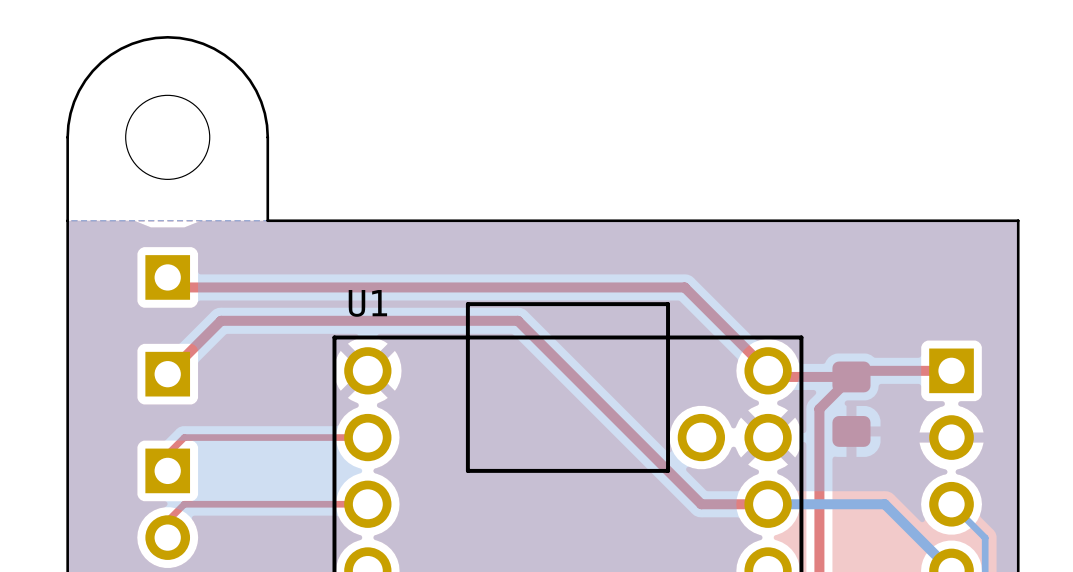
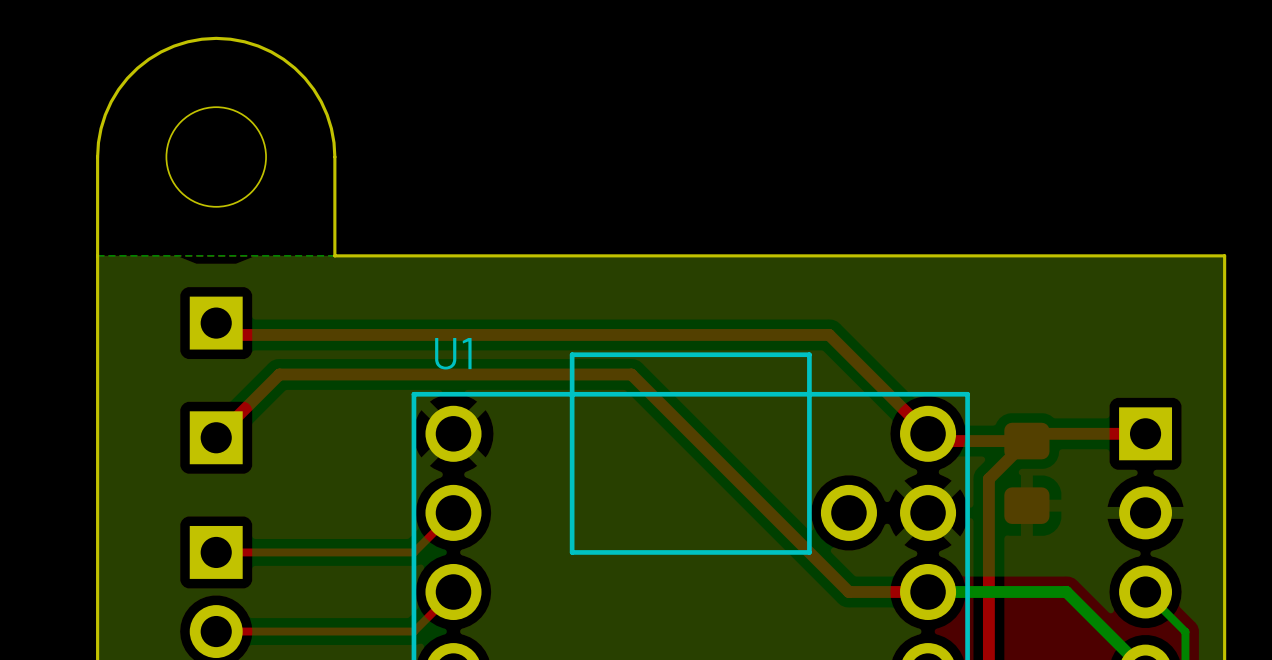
top track: (367, 437) (184, 437) (167, 454) -> (453, 512) (413, 552) (216, 552)
top track: (367, 504) (184, 504) (167, 520) -> (453, 591) (413, 631) (216, 631)

